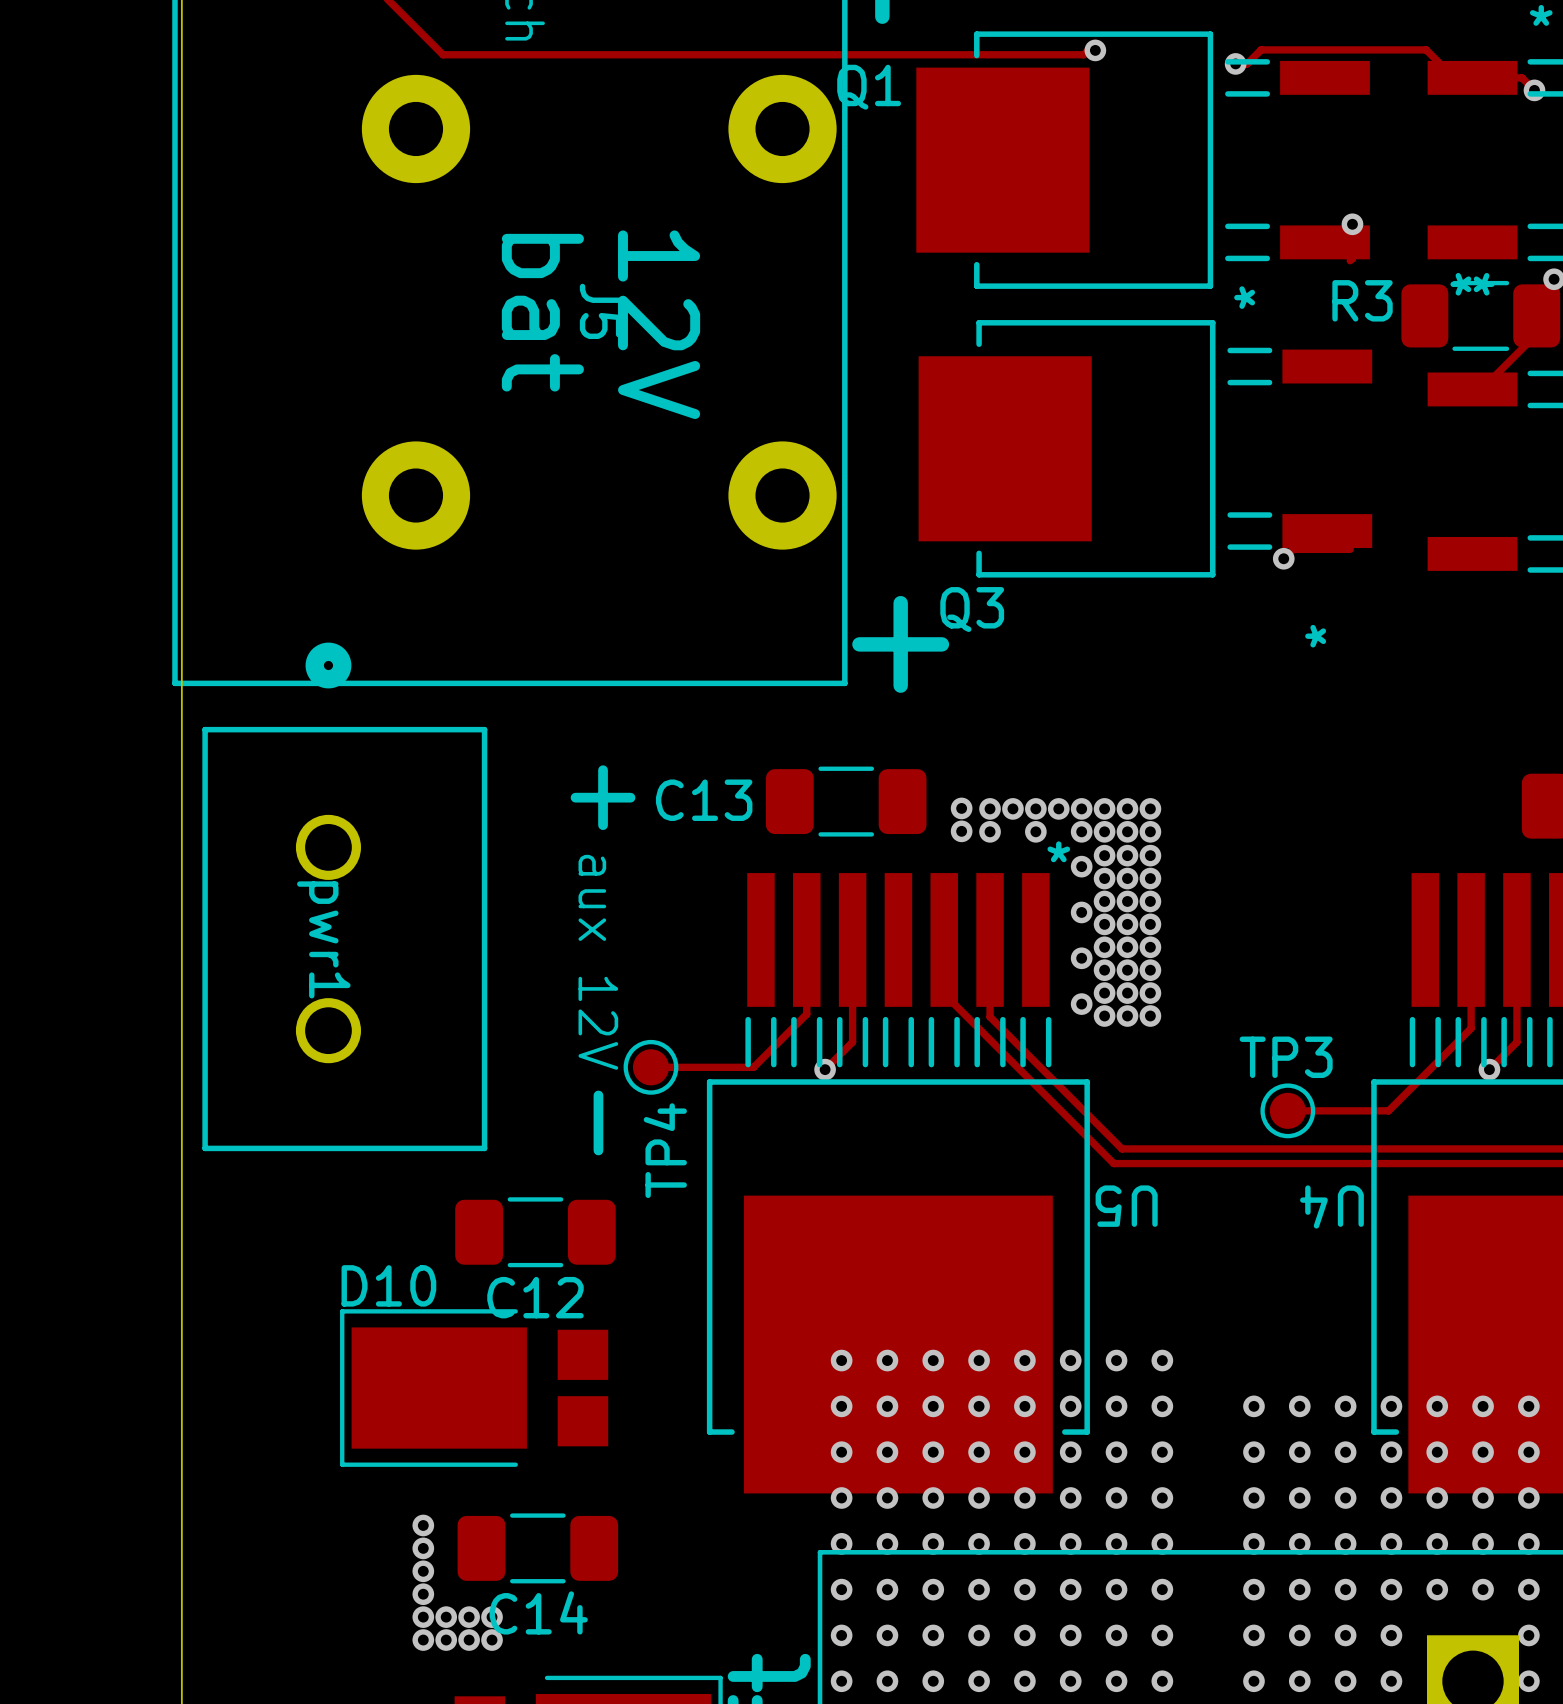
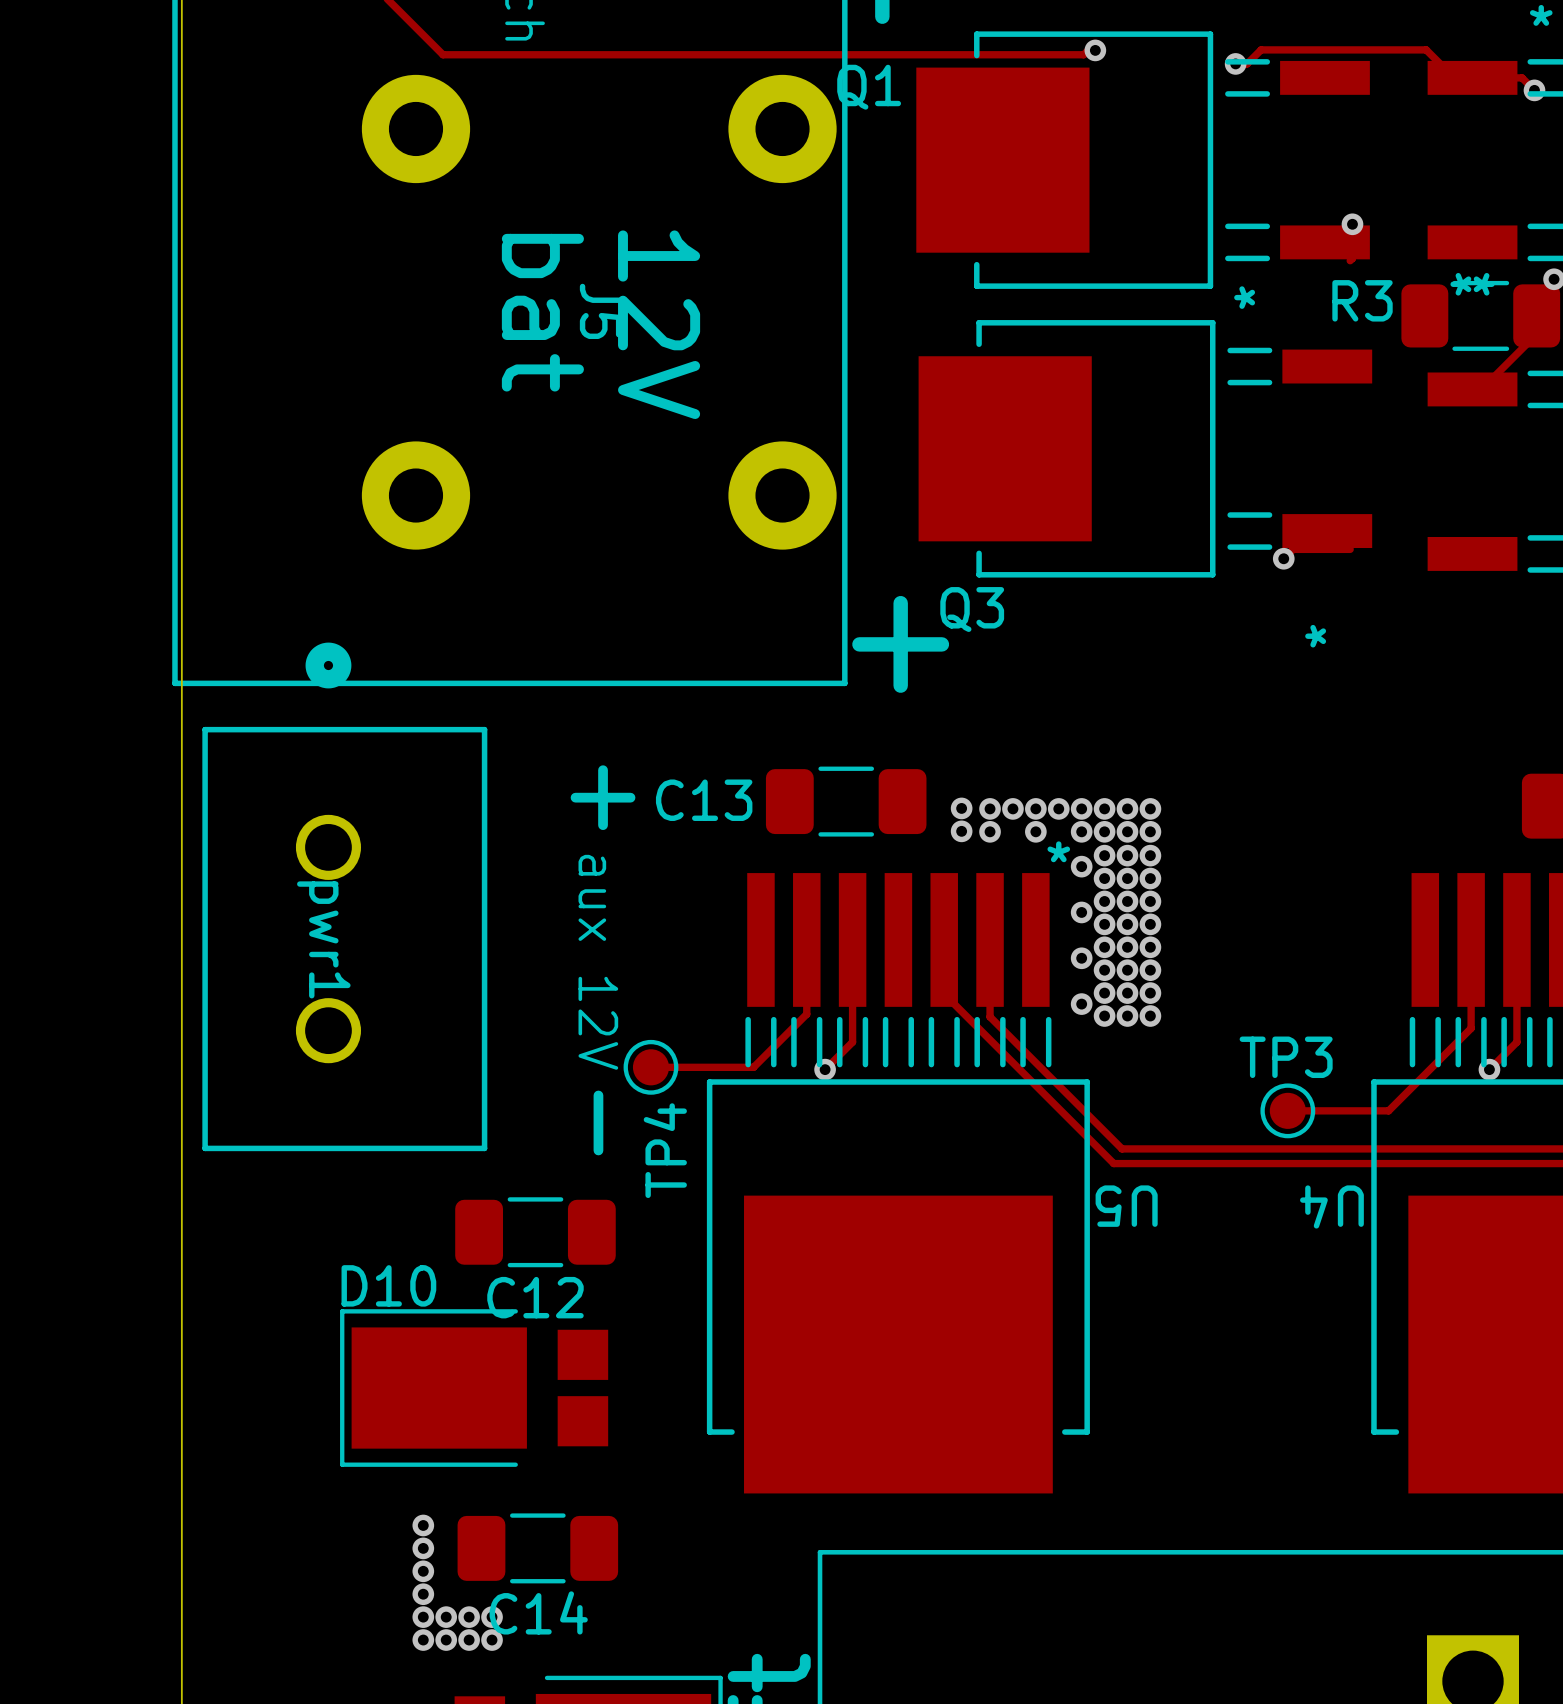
via: (841, 1360) -> none
via: (887, 1360) -> none
via: (933, 1360) -> none
via: (979, 1360) -> none
via: (1024, 1360) -> none
via: (1070, 1360) -> none
via: (1116, 1360) -> none
via: (1162, 1360) -> none
via: (841, 1406) -> none
via: (887, 1406) -> none
via: (933, 1406) -> none
via: (979, 1406) -> none
via: (1024, 1406) -> none
via: (1070, 1406) -> none
via: (1116, 1406) -> none
via: (1162, 1406) -> none
via: (1253, 1406) -> none
via: (1299, 1406) -> none
via: (1345, 1406) -> none
via: (1391, 1406) -> none
via: (1437, 1406) -> none
via: (1483, 1406) -> none
via: (1528, 1406) -> none
via: (841, 1452) -> none
via: (887, 1452) -> none
via: (933, 1452) -> none
via: (979, 1452) -> none
via: (1024, 1452) -> none
via: (1070, 1452) -> none
via: (1116, 1452) -> none
via: (1162, 1452) -> none
via: (1253, 1452) -> none
via: (1299, 1452) -> none
via: (1345, 1452) -> none
via: (1391, 1452) -> none
via: (1437, 1452) -> none
via: (1483, 1452) -> none
via: (1528, 1452) -> none
via: (841, 1497) -> none
via: (887, 1497) -> none
via: (933, 1497) -> none
via: (979, 1497) -> none
via: (1024, 1497) -> none
via: (1070, 1497) -> none
via: (1116, 1497) -> none
via: (1162, 1497) -> none
via: (1253, 1497) -> none
via: (1299, 1497) -> none
via: (1345, 1497) -> none
via: (1391, 1497) -> none
via: (1437, 1497) -> none
via: (1483, 1497) -> none
via: (1528, 1497) -> none
via: (841, 1543) -> none
via: (887, 1543) -> none
via: (933, 1543) -> none
via: (979, 1543) -> none
via: (1024, 1543) -> none
via: (1070, 1543) -> none
via: (1116, 1543) -> none
via: (1162, 1543) -> none
via: (1253, 1543) -> none
via: (1299, 1543) -> none
via: (1345, 1543) -> none
via: (1391, 1543) -> none
via: (1437, 1543) -> none
via: (1483, 1543) -> none
via: (1528, 1543) -> none
via: (841, 1589) -> none
via: (887, 1589) -> none
via: (933, 1589) -> none
via: (979, 1589) -> none
via: (1024, 1589) -> none
via: (1070, 1589) -> none
via: (1116, 1589) -> none
via: (1162, 1589) -> none
via: (1253, 1589) -> none
via: (1299, 1589) -> none
via: (1345, 1589) -> none
via: (1391, 1589) -> none
via: (1437, 1589) -> none
via: (1483, 1589) -> none
via: (1528, 1589) -> none
via: (841, 1635) -> none
via: (887, 1635) -> none
via: (933, 1635) -> none
via: (979, 1635) -> none
via: (1024, 1635) -> none
via: (1070, 1635) -> none
via: (1116, 1635) -> none
via: (1162, 1635) -> none
via: (1253, 1635) -> none
via: (1299, 1635) -> none
via: (1345, 1635) -> none
via: (1391, 1635) -> none
via: (1528, 1635) -> none
via: (841, 1681) -> none
via: (887, 1681) -> none
via: (933, 1681) -> none
via: (979, 1681) -> none
via: (1024, 1681) -> none
via: (1070, 1681) -> none
via: (1116, 1681) -> none
via: (1162, 1681) -> none
via: (1253, 1681) -> none
via: (1299, 1681) -> none
via: (1345, 1681) -> none
via: (1391, 1681) -> none
via: (1528, 1681) -> none

